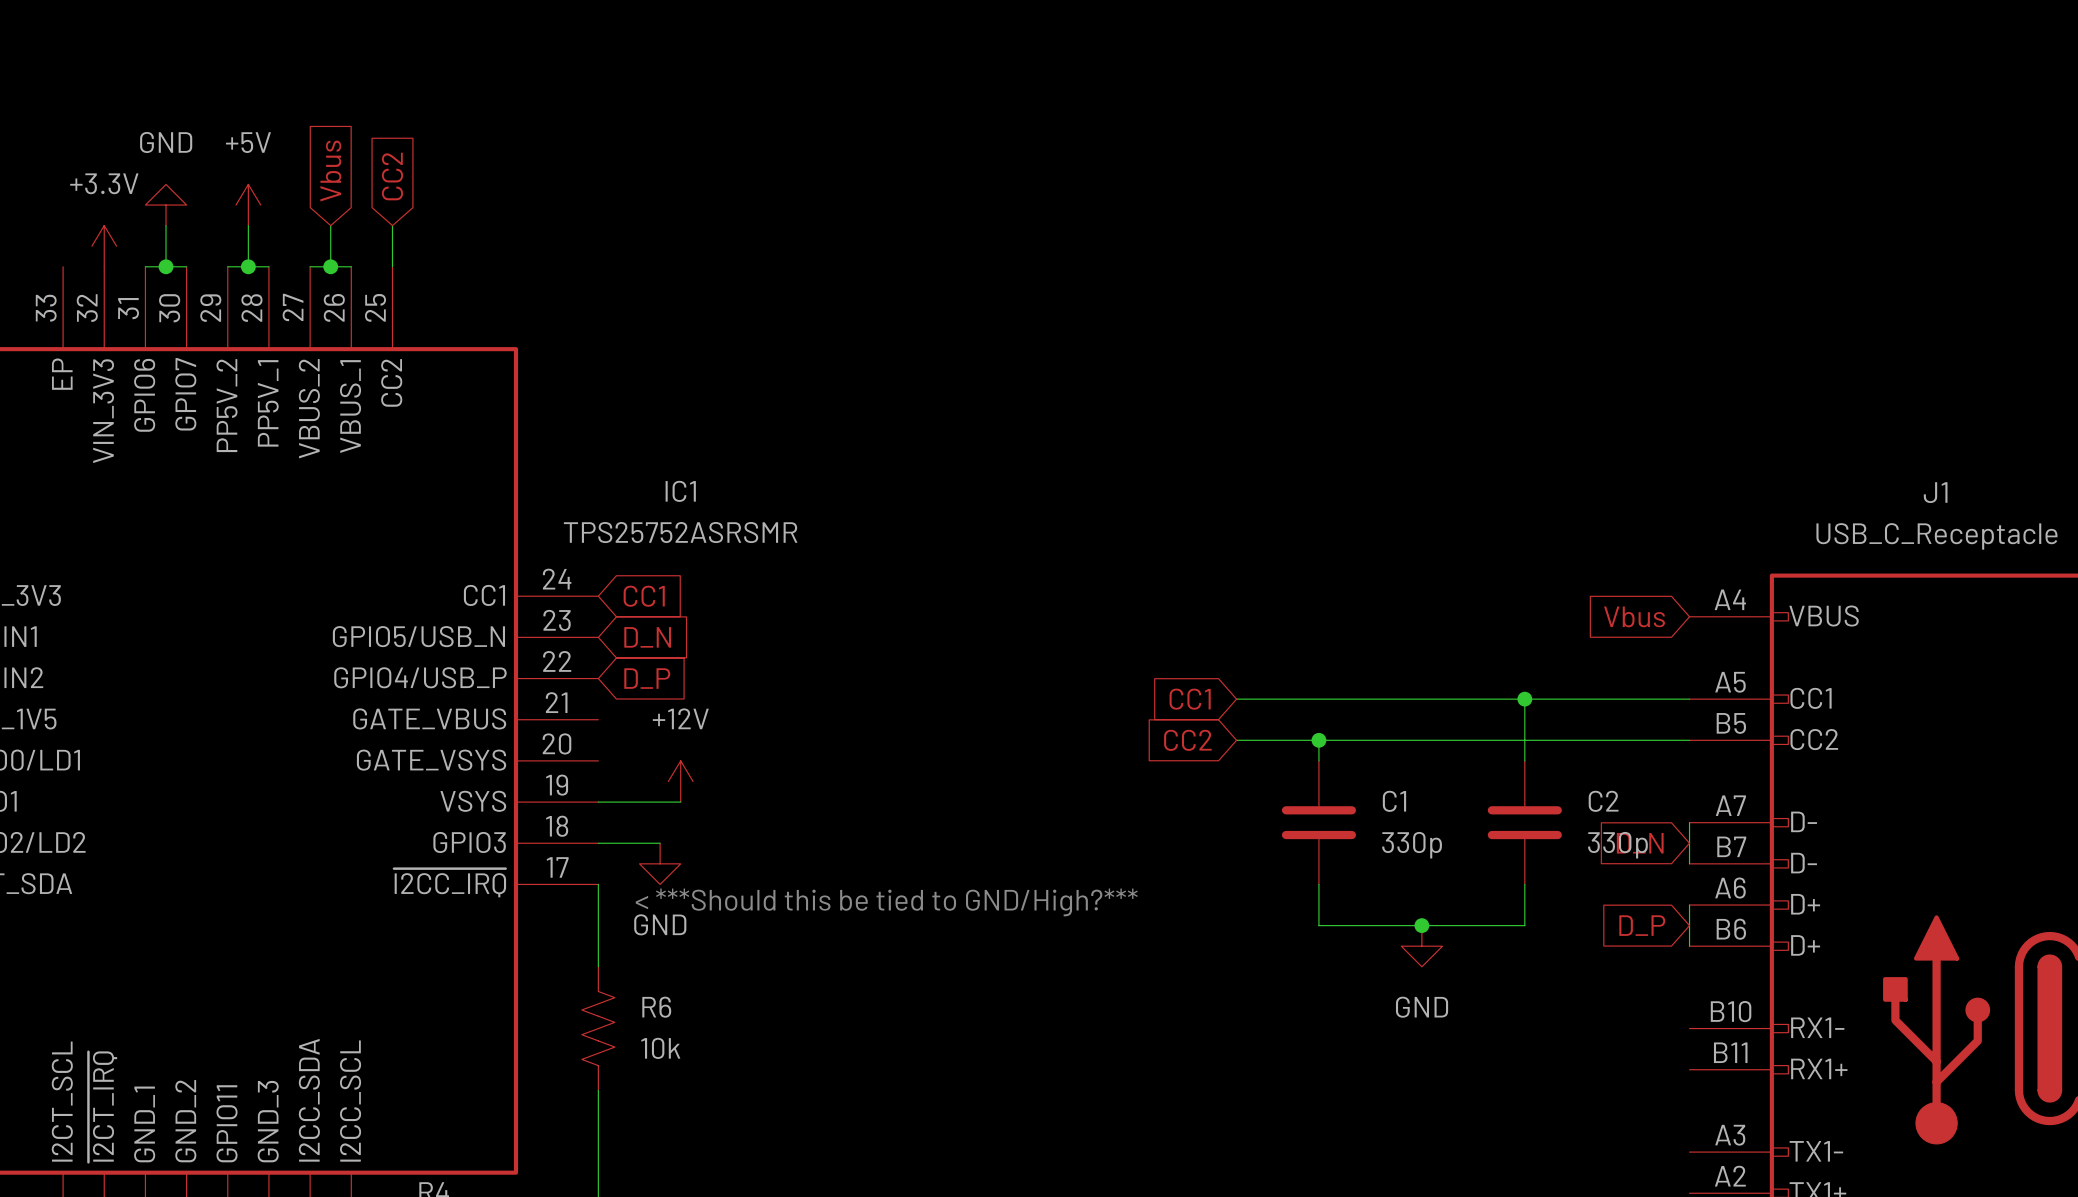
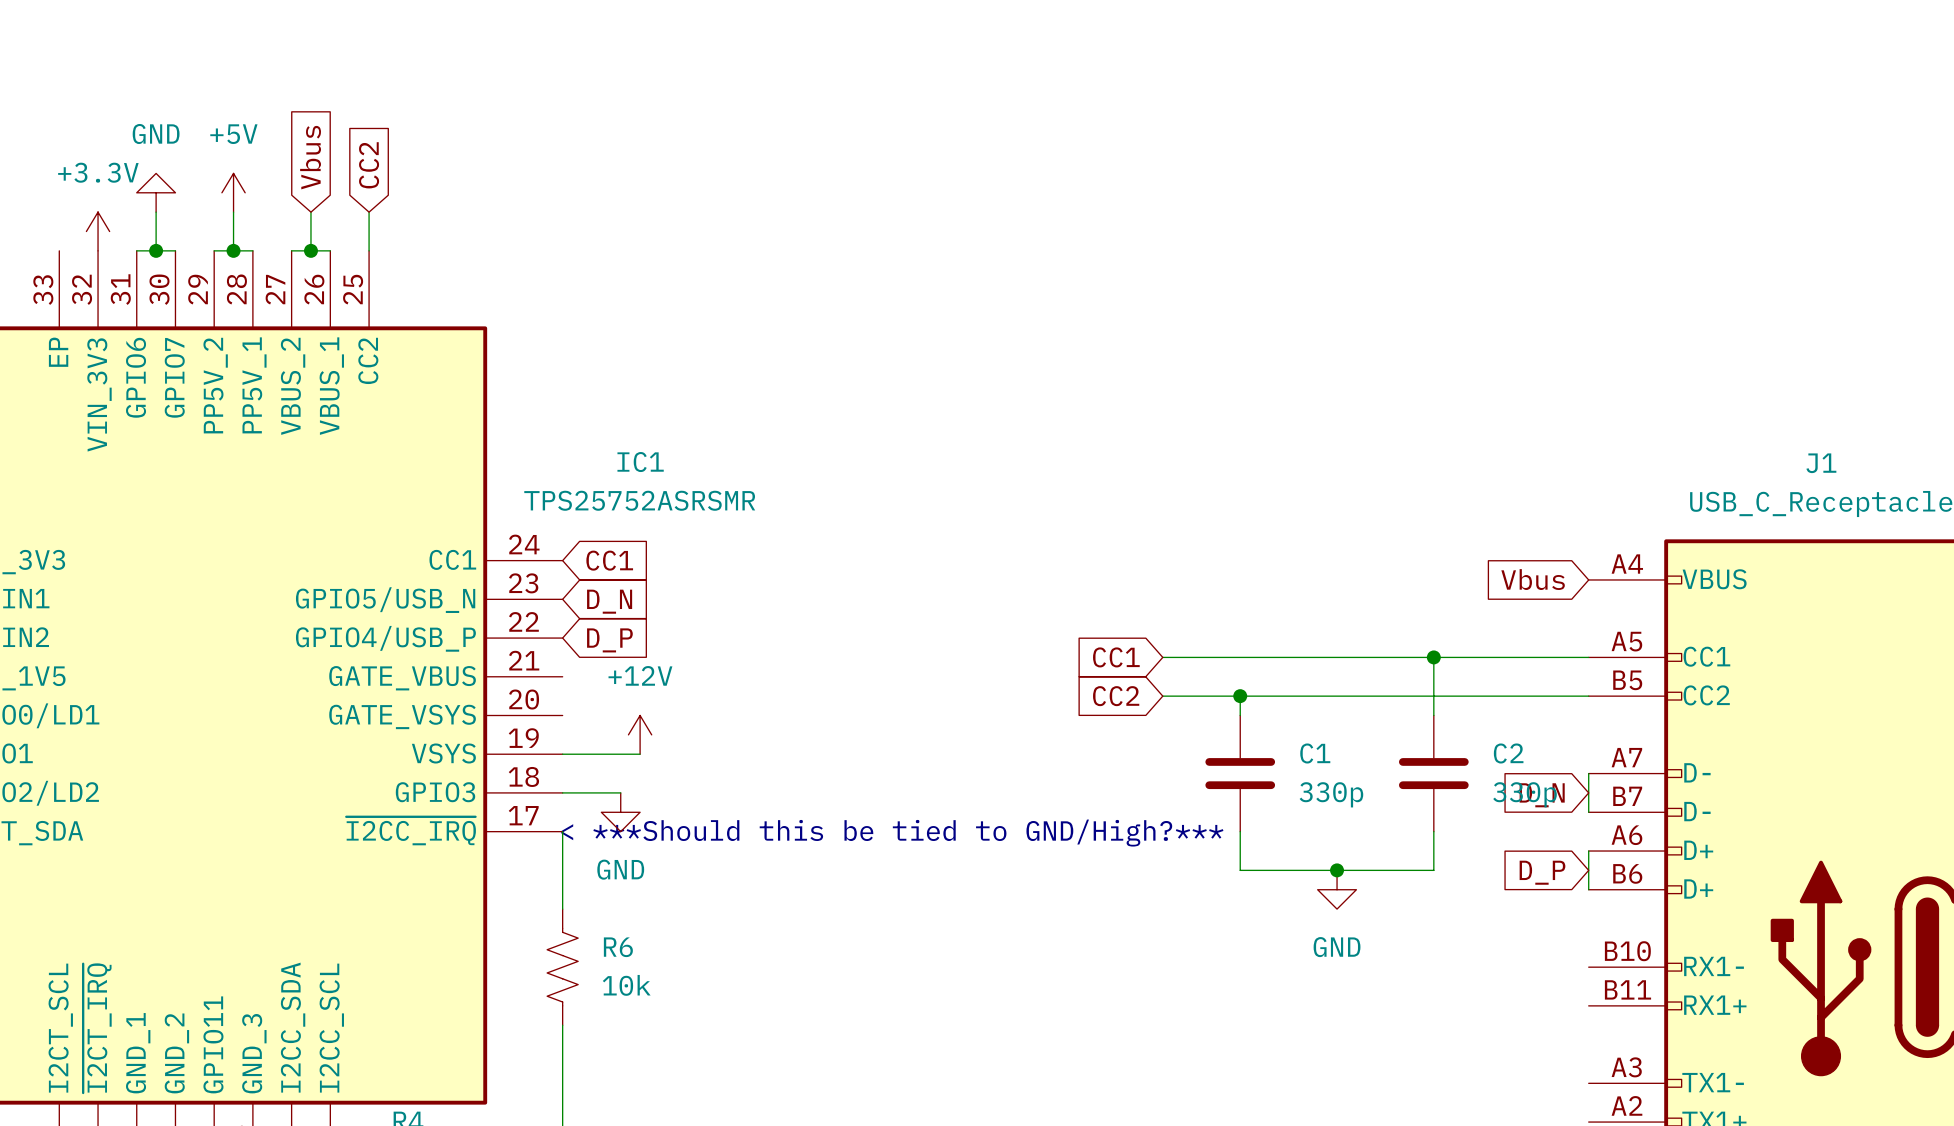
text position: < ***Should this be tied to GND/High?*** (886, 902) -> < ***Should this be tied to GND/High?*** (892, 833)

